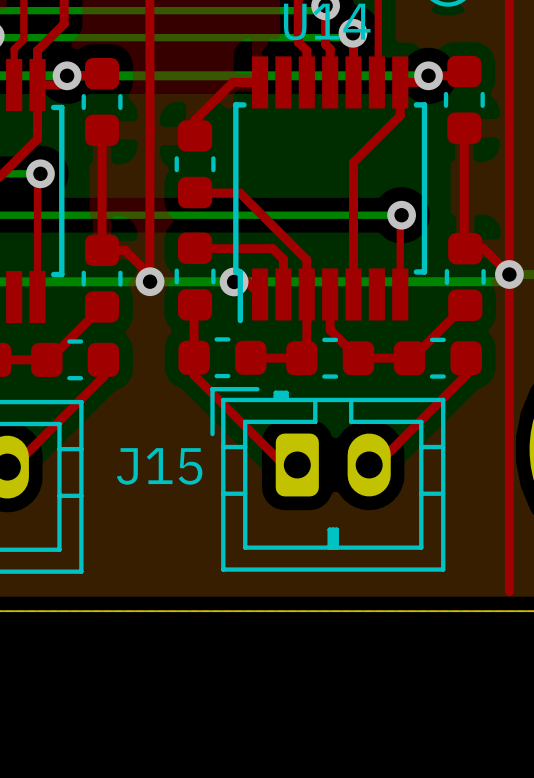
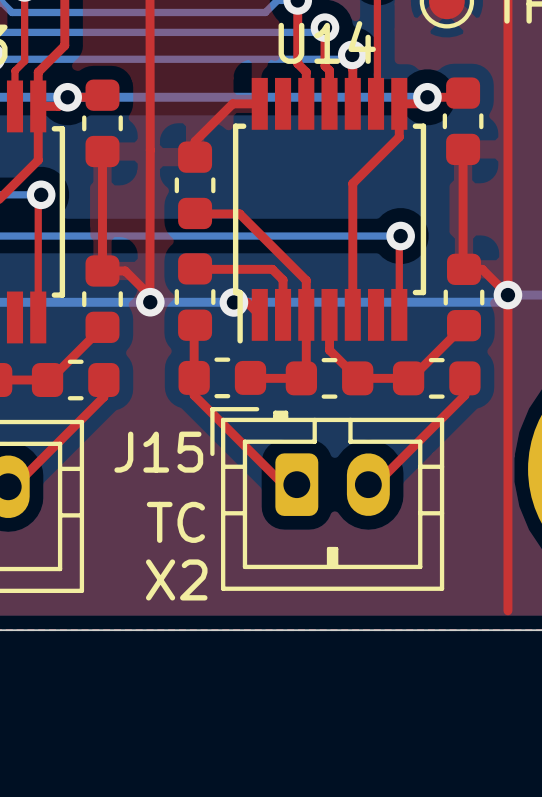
J15 name position: J15 (159, 466) -> J15 (158, 452)
text: none -> TC (175, 522)
text: none -> X2 (176, 579)

